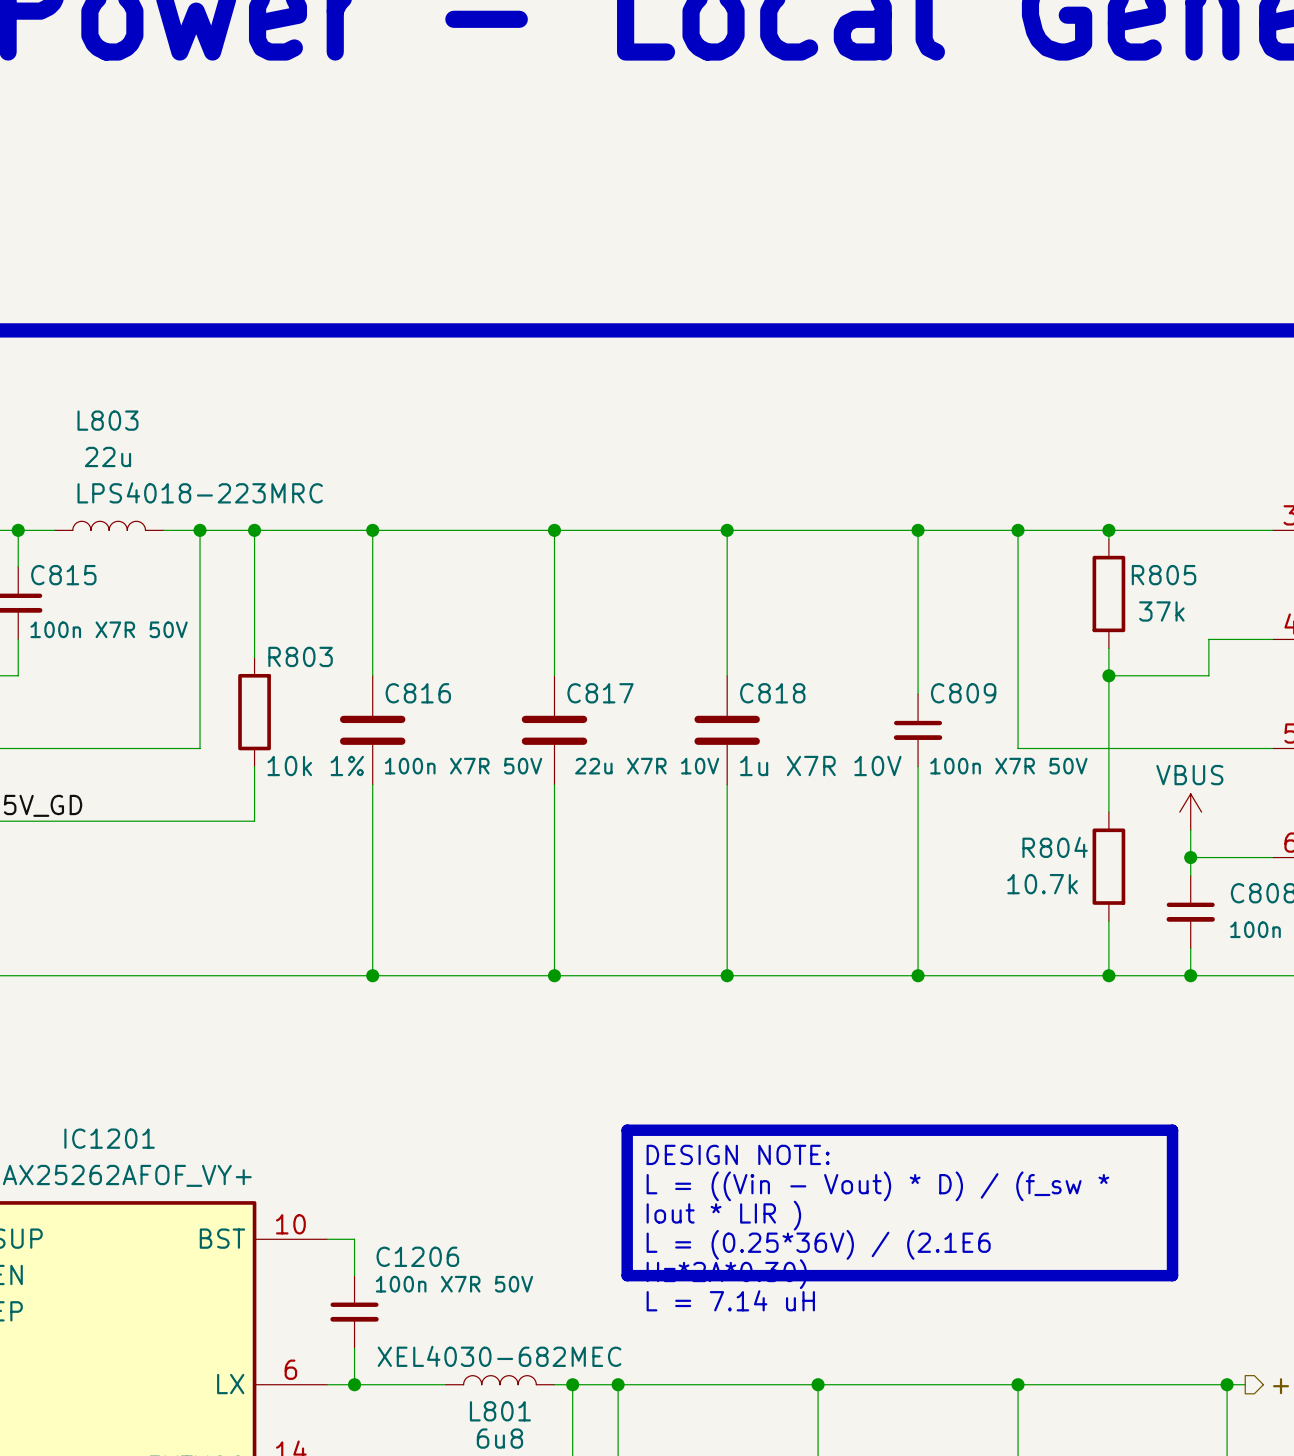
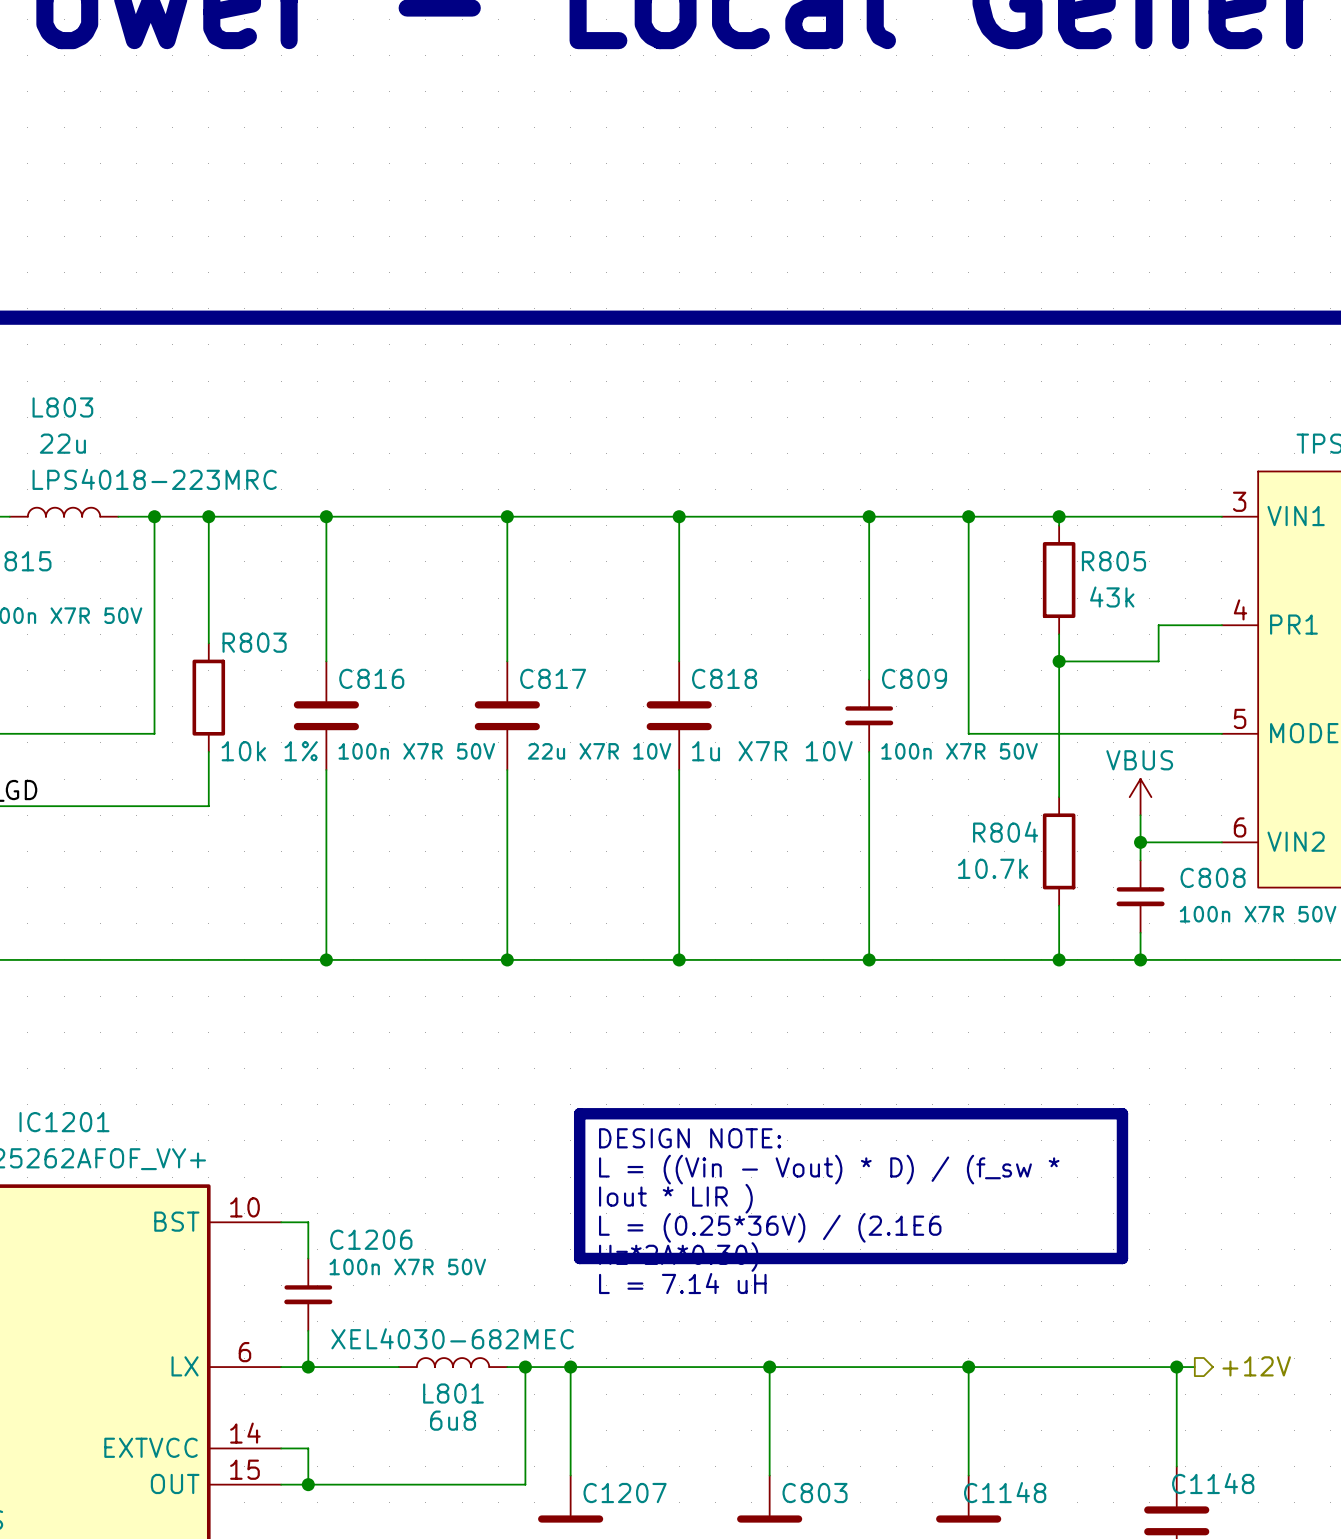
R805 value: 37k (1161, 611) -> 43k (1112, 597)

